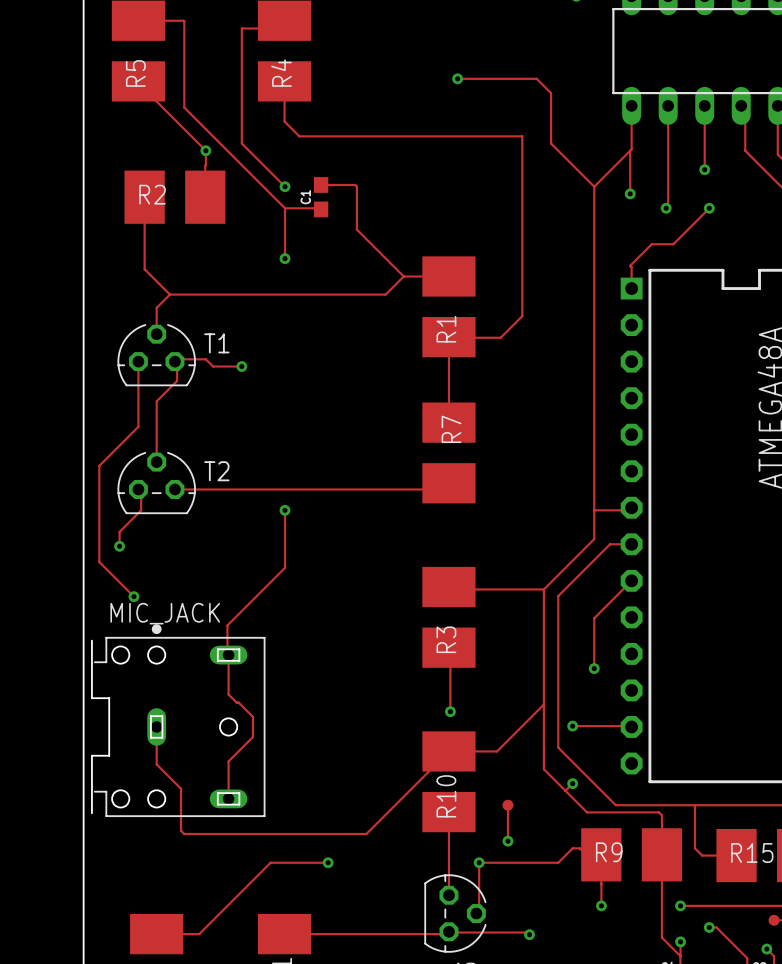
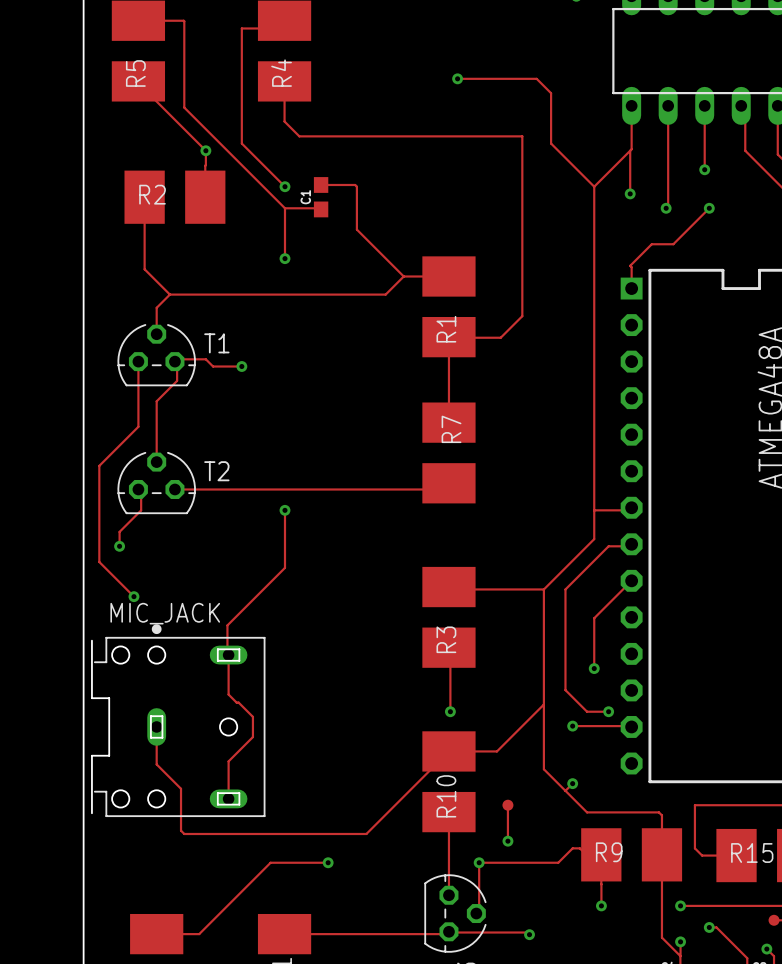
track: (631, 544) (610, 544) (558, 596) (558, 747) (615, 805) (694, 805) -> (631, 544) (629, 546) (608, 546) (565, 589) (565, 690) (587, 711) (608, 711)
via: none -> (608, 711)

